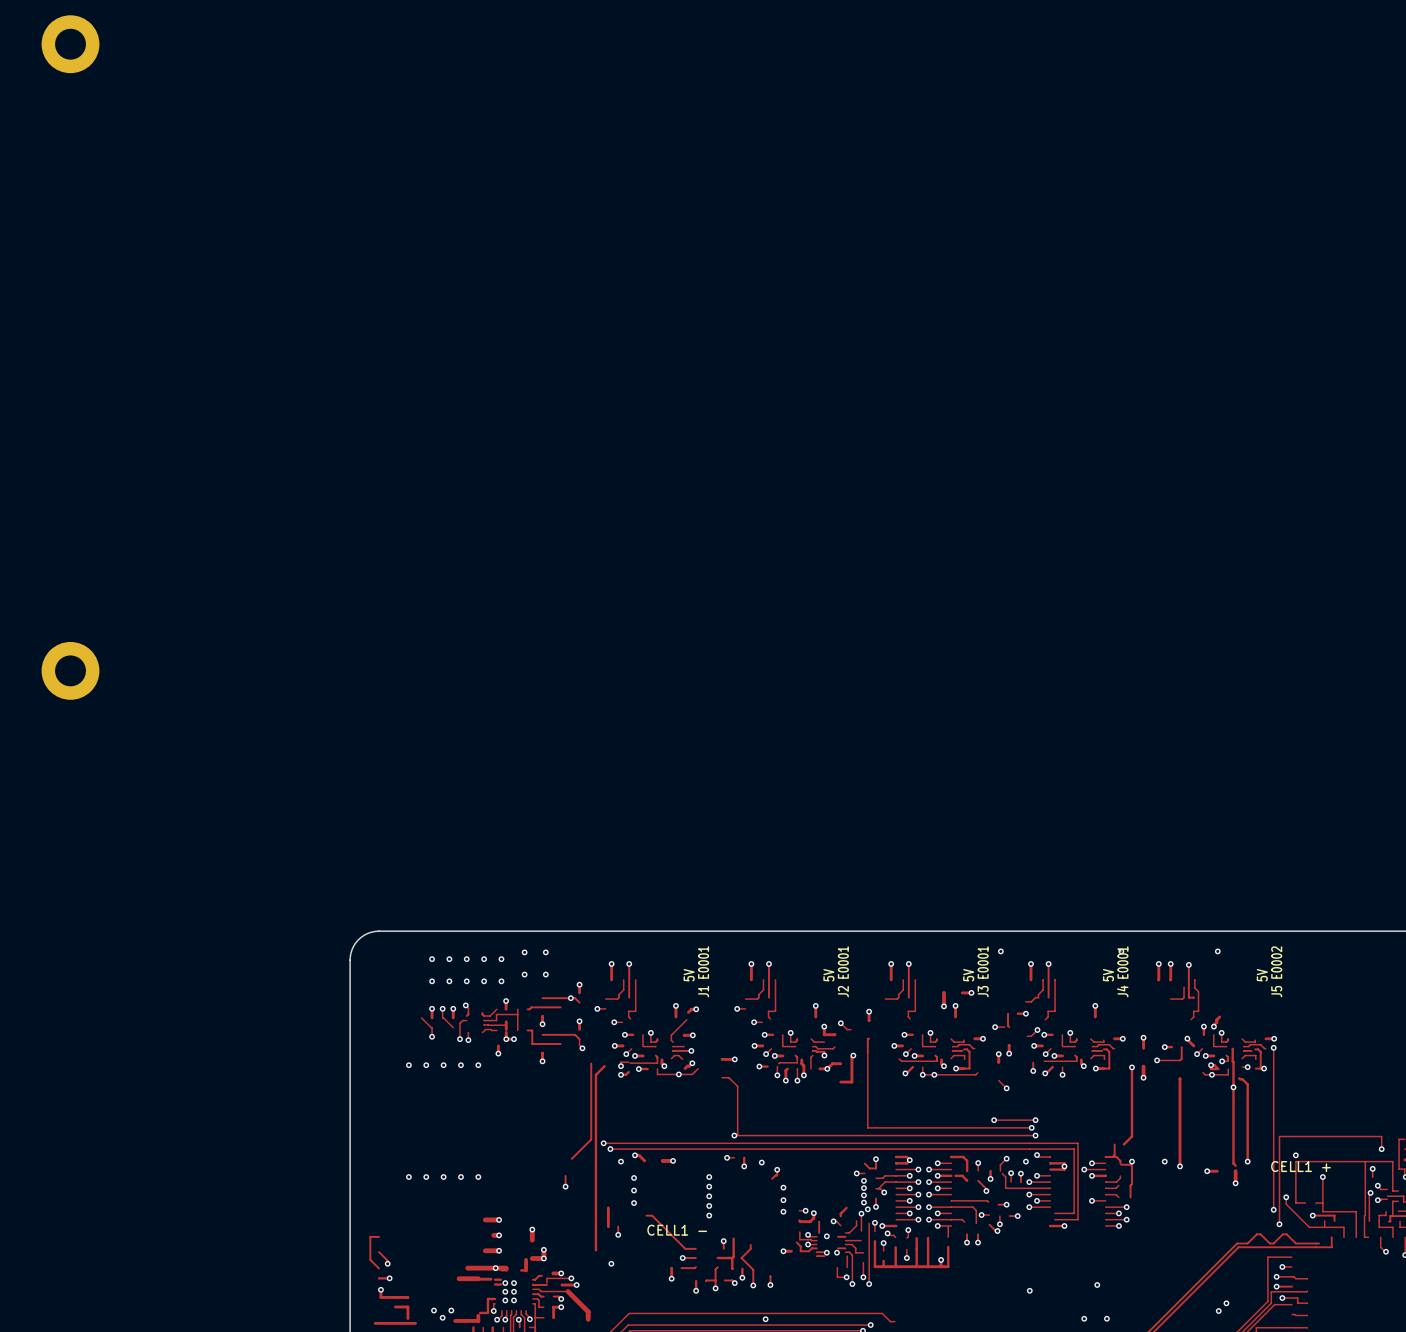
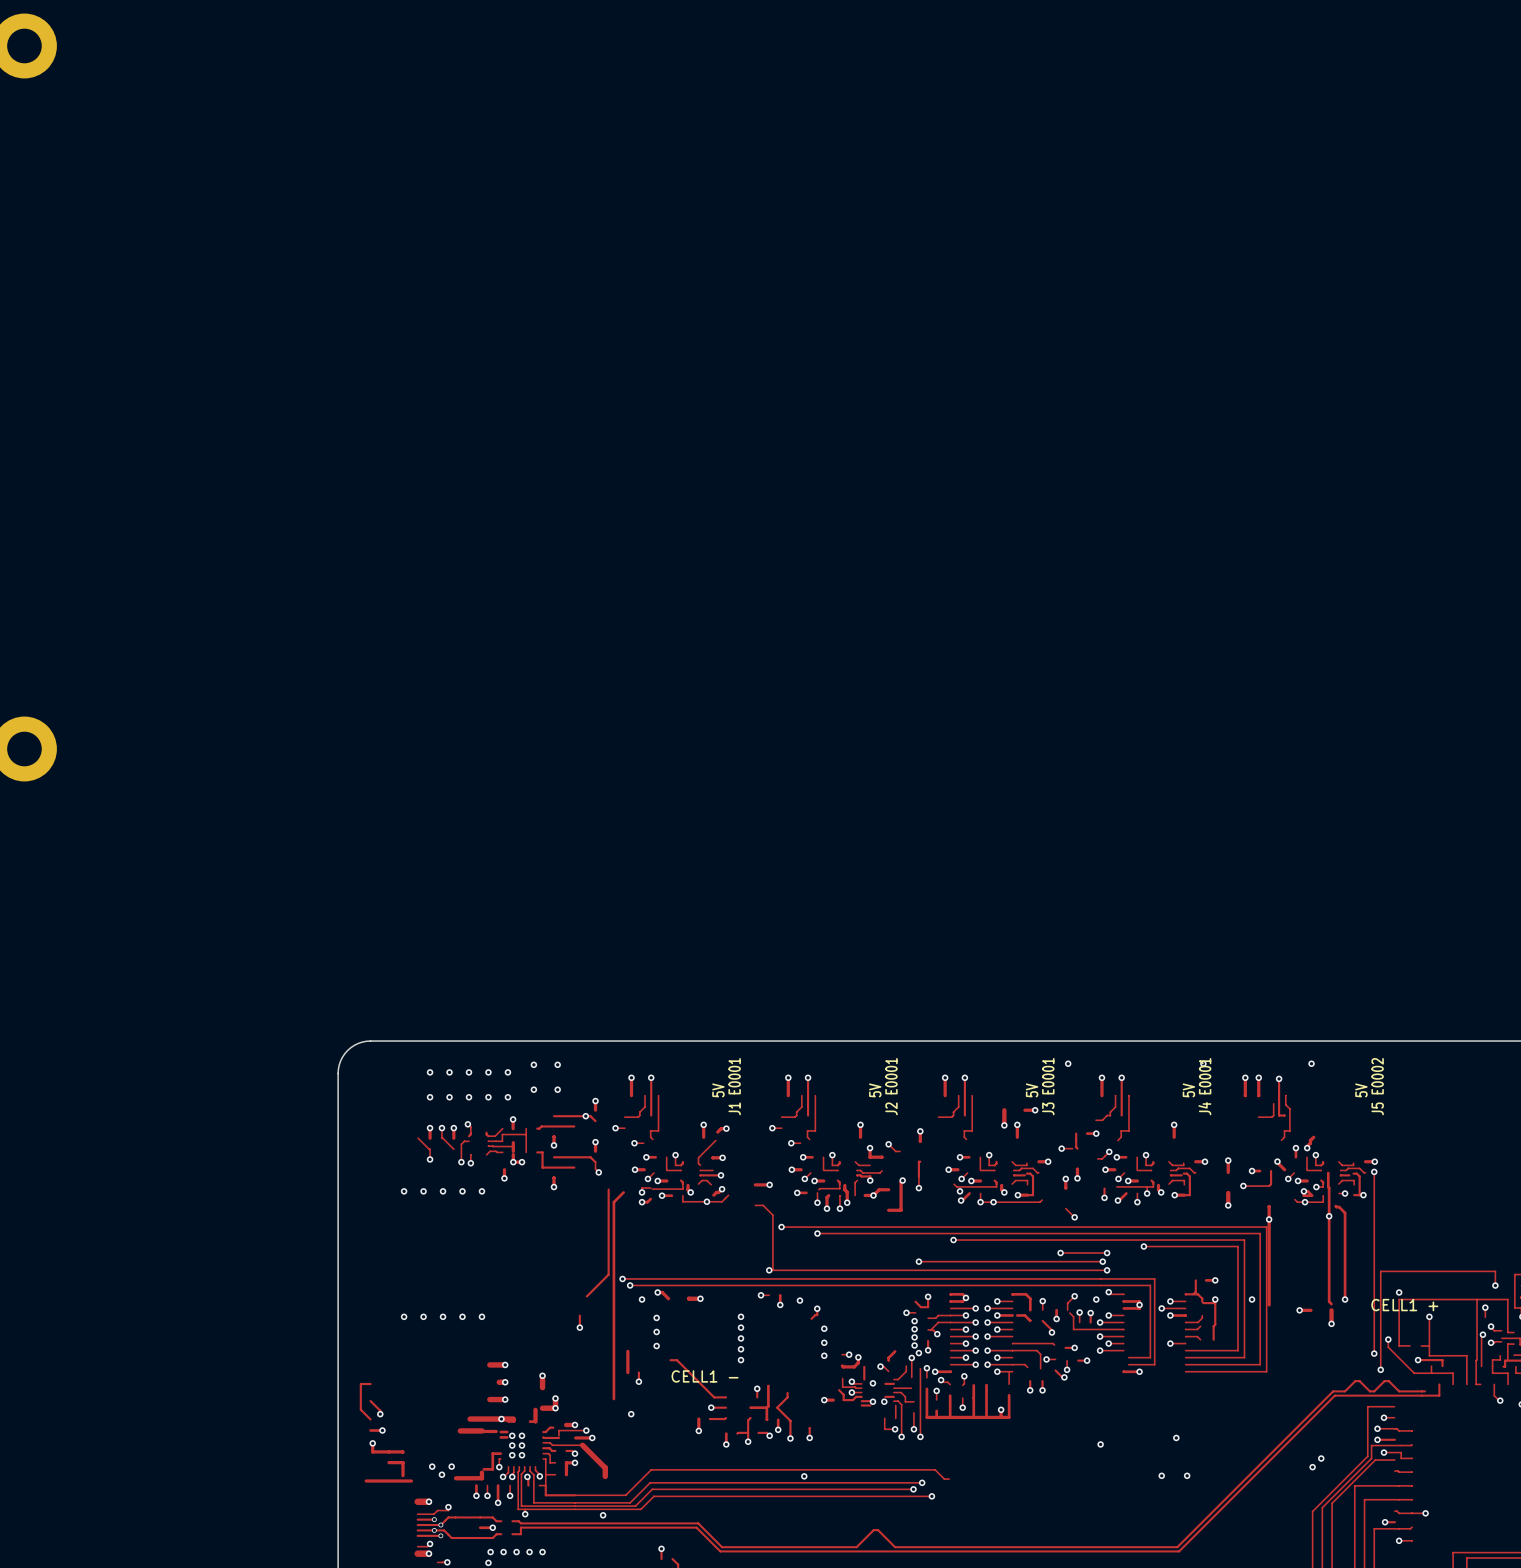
track: none -> (1147, 1186) (1147, 1193)
track: (867, 1062) (867, 1127) -> none
via: none -> (918, 1188)
via: none -> (960, 1191)
via: none -> (1147, 1193)
track: (1131, 1067) (1131, 1136) (1123, 1144) -> (1215, 1280) (1206, 1280)
via: (1131, 1067) -> none
via: none -> (1269, 1219)
track: none -> (781, 1227) (1266, 1227) (1266, 1371) (1200, 1371)
via: none -> (781, 1227)
track: none -> (817, 1233) (1260, 1233) (1260, 1364) (1209, 1364)
via: none -> (817, 1233)
track: none -> (953, 1240) (1244, 1240) (1244, 1357) (1200, 1357)
via: none -> (953, 1240)
track: none -> (1143, 1246) (1237, 1246) (1237, 1350) (1209, 1350)
via: none -> (1143, 1246)
via: none -> (918, 1261)
via: none -> (1215, 1280)
via: (1180, 1166) -> none
via: (1126, 1207) -> none
via: (1118, 1213) -> none
via: (1126, 1219) -> none
via: (1118, 1225) -> none

